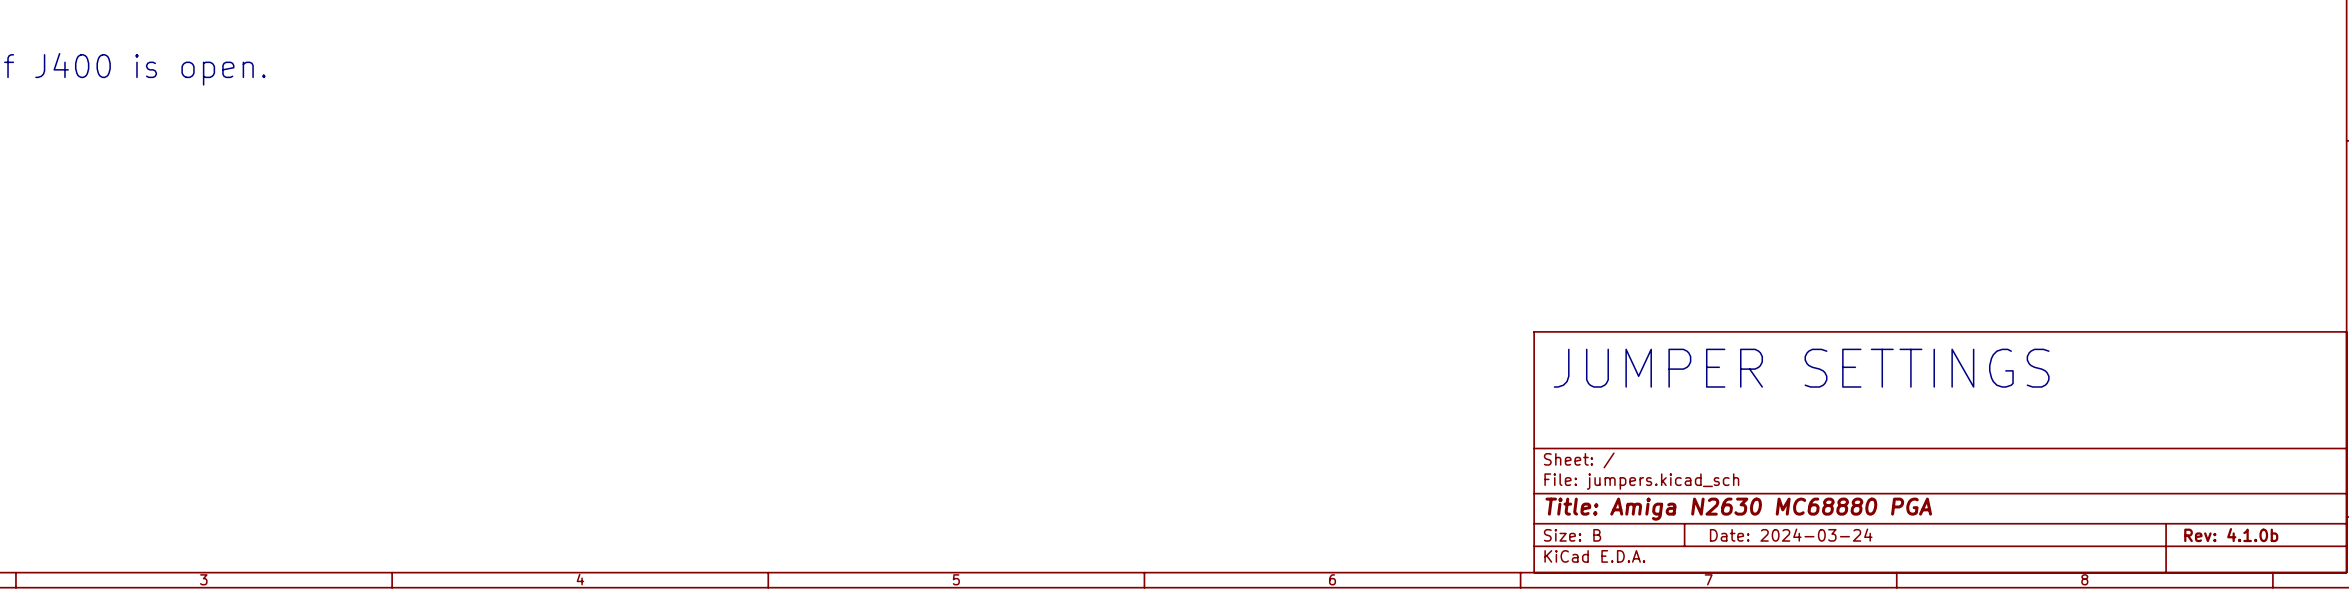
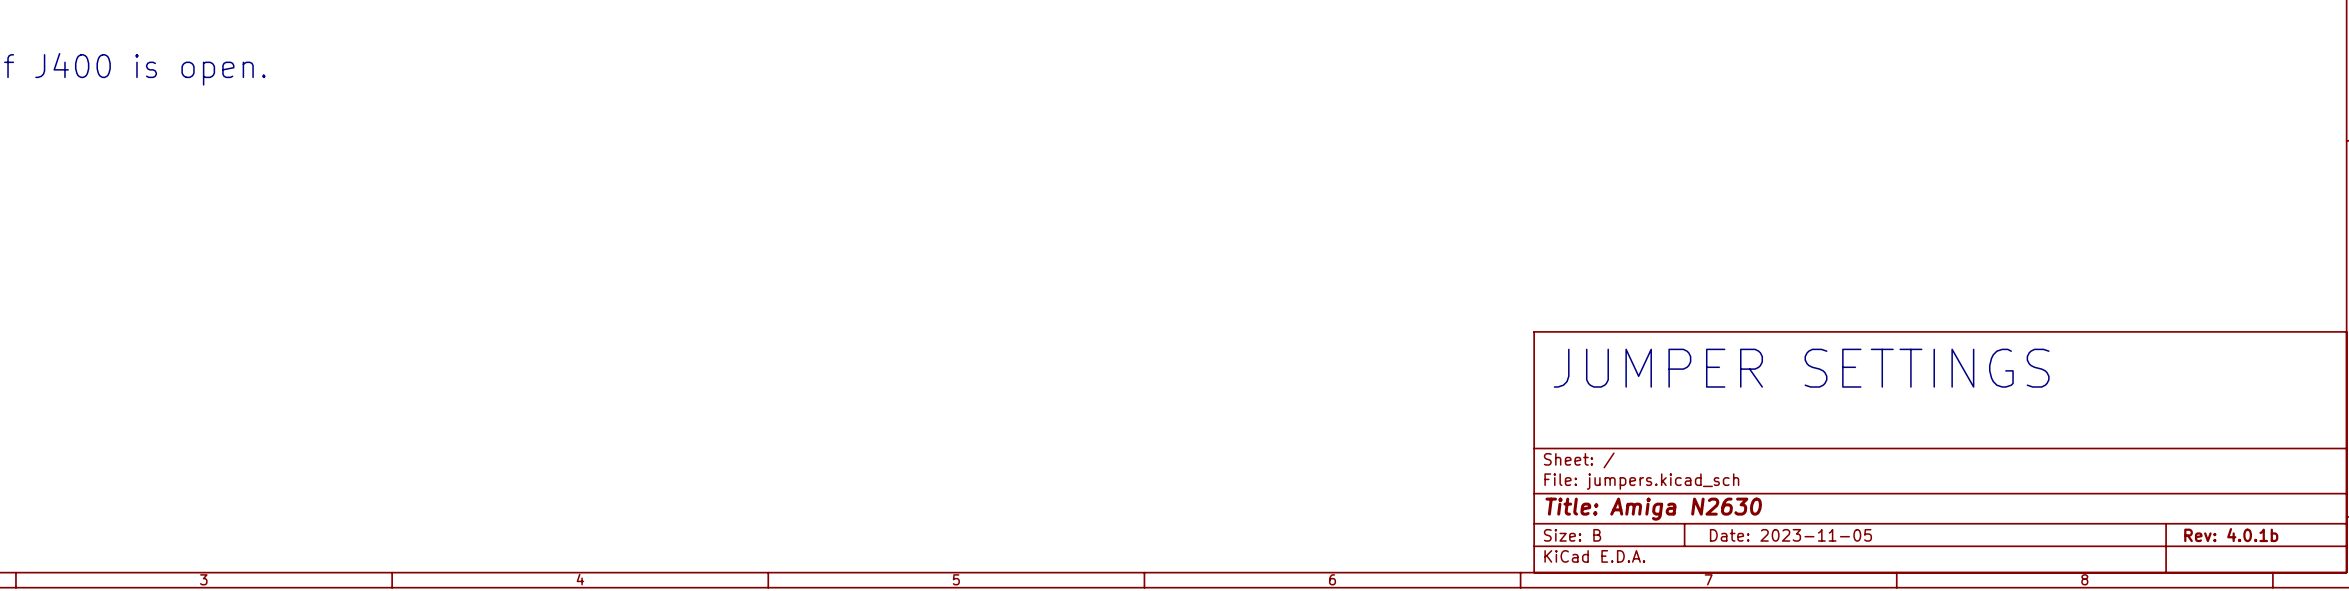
title block: Title: Amiga N2630 MC68880 PGA (1738, 509) -> Title: Amiga N2630 (1653, 509)
title block: Date: 2024-03-24 (1791, 535) -> Date: 2023-11-05 (1790, 535)
title block: Rev: 4.1.0b (2231, 535) -> Rev: 4.0.1b (2231, 535)

